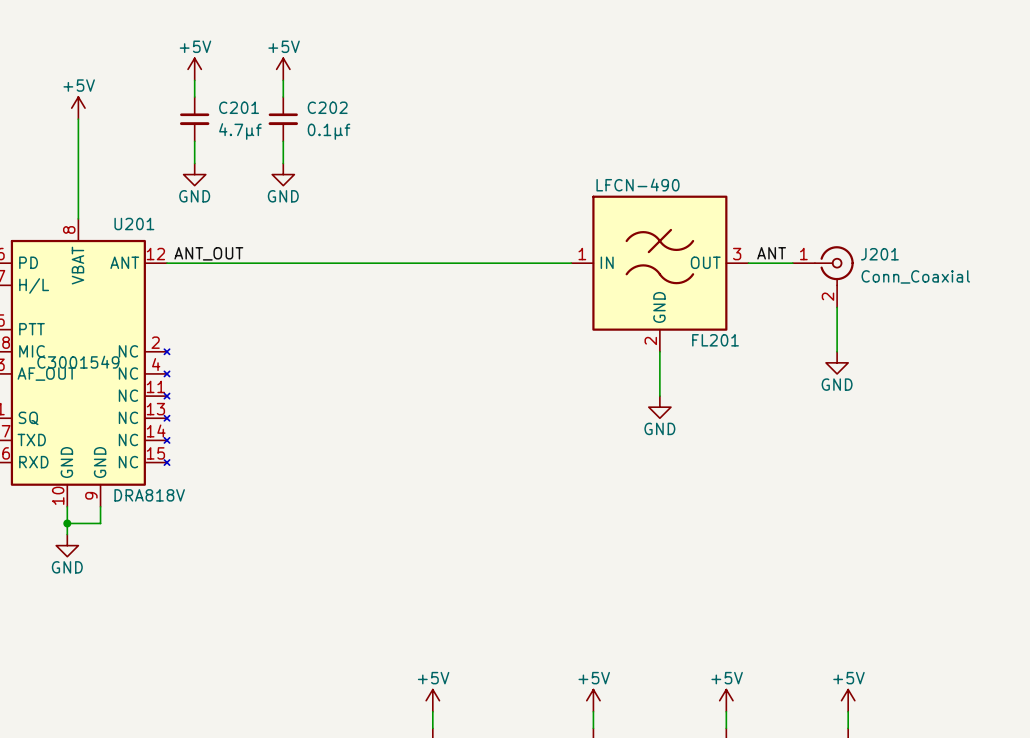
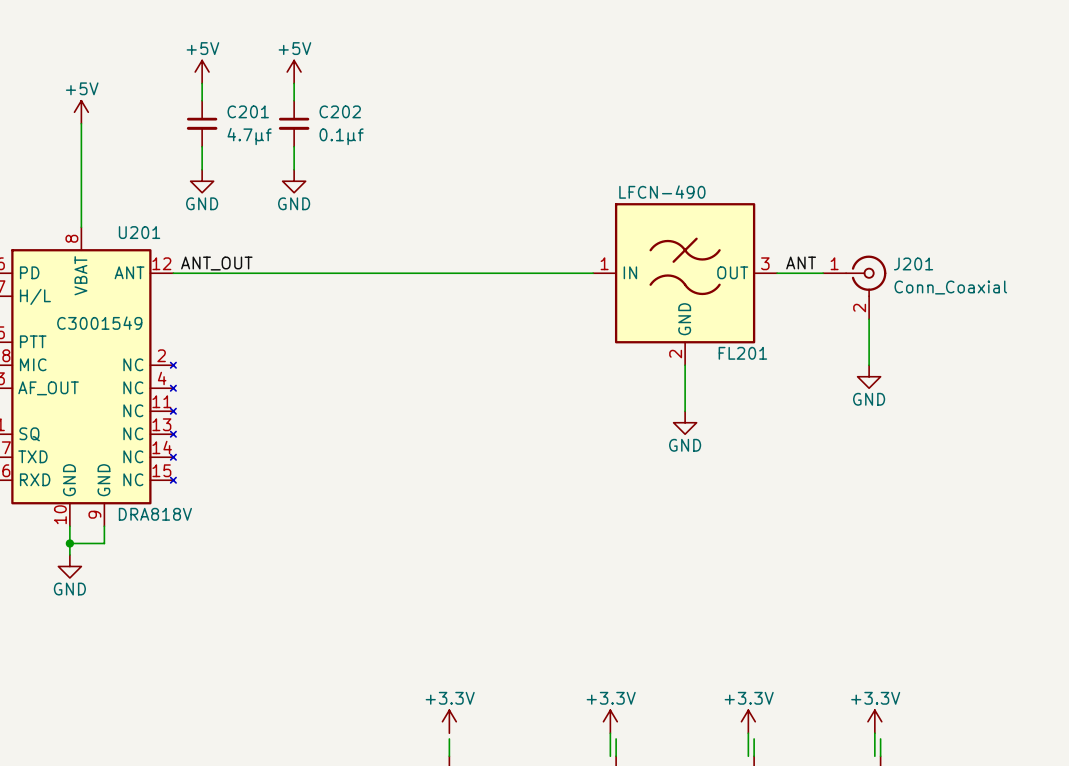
U201 text position: C3001549 (78, 362) -> C3001549 (99, 323)
power symbol: +5V (432, 700) -> +3.3V (449, 721)
power symbol: +5V (593, 700) -> +3.3V (610, 721)
power symbol: +5V (726, 700) -> +3.3V (748, 721)
power symbol: +5V (848, 700) -> +3.3V (874, 721)
wire: none -> (610, 733) (610, 756)
wire: none -> (748, 733) (748, 756)
wire: none -> (874, 733) (874, 756)

